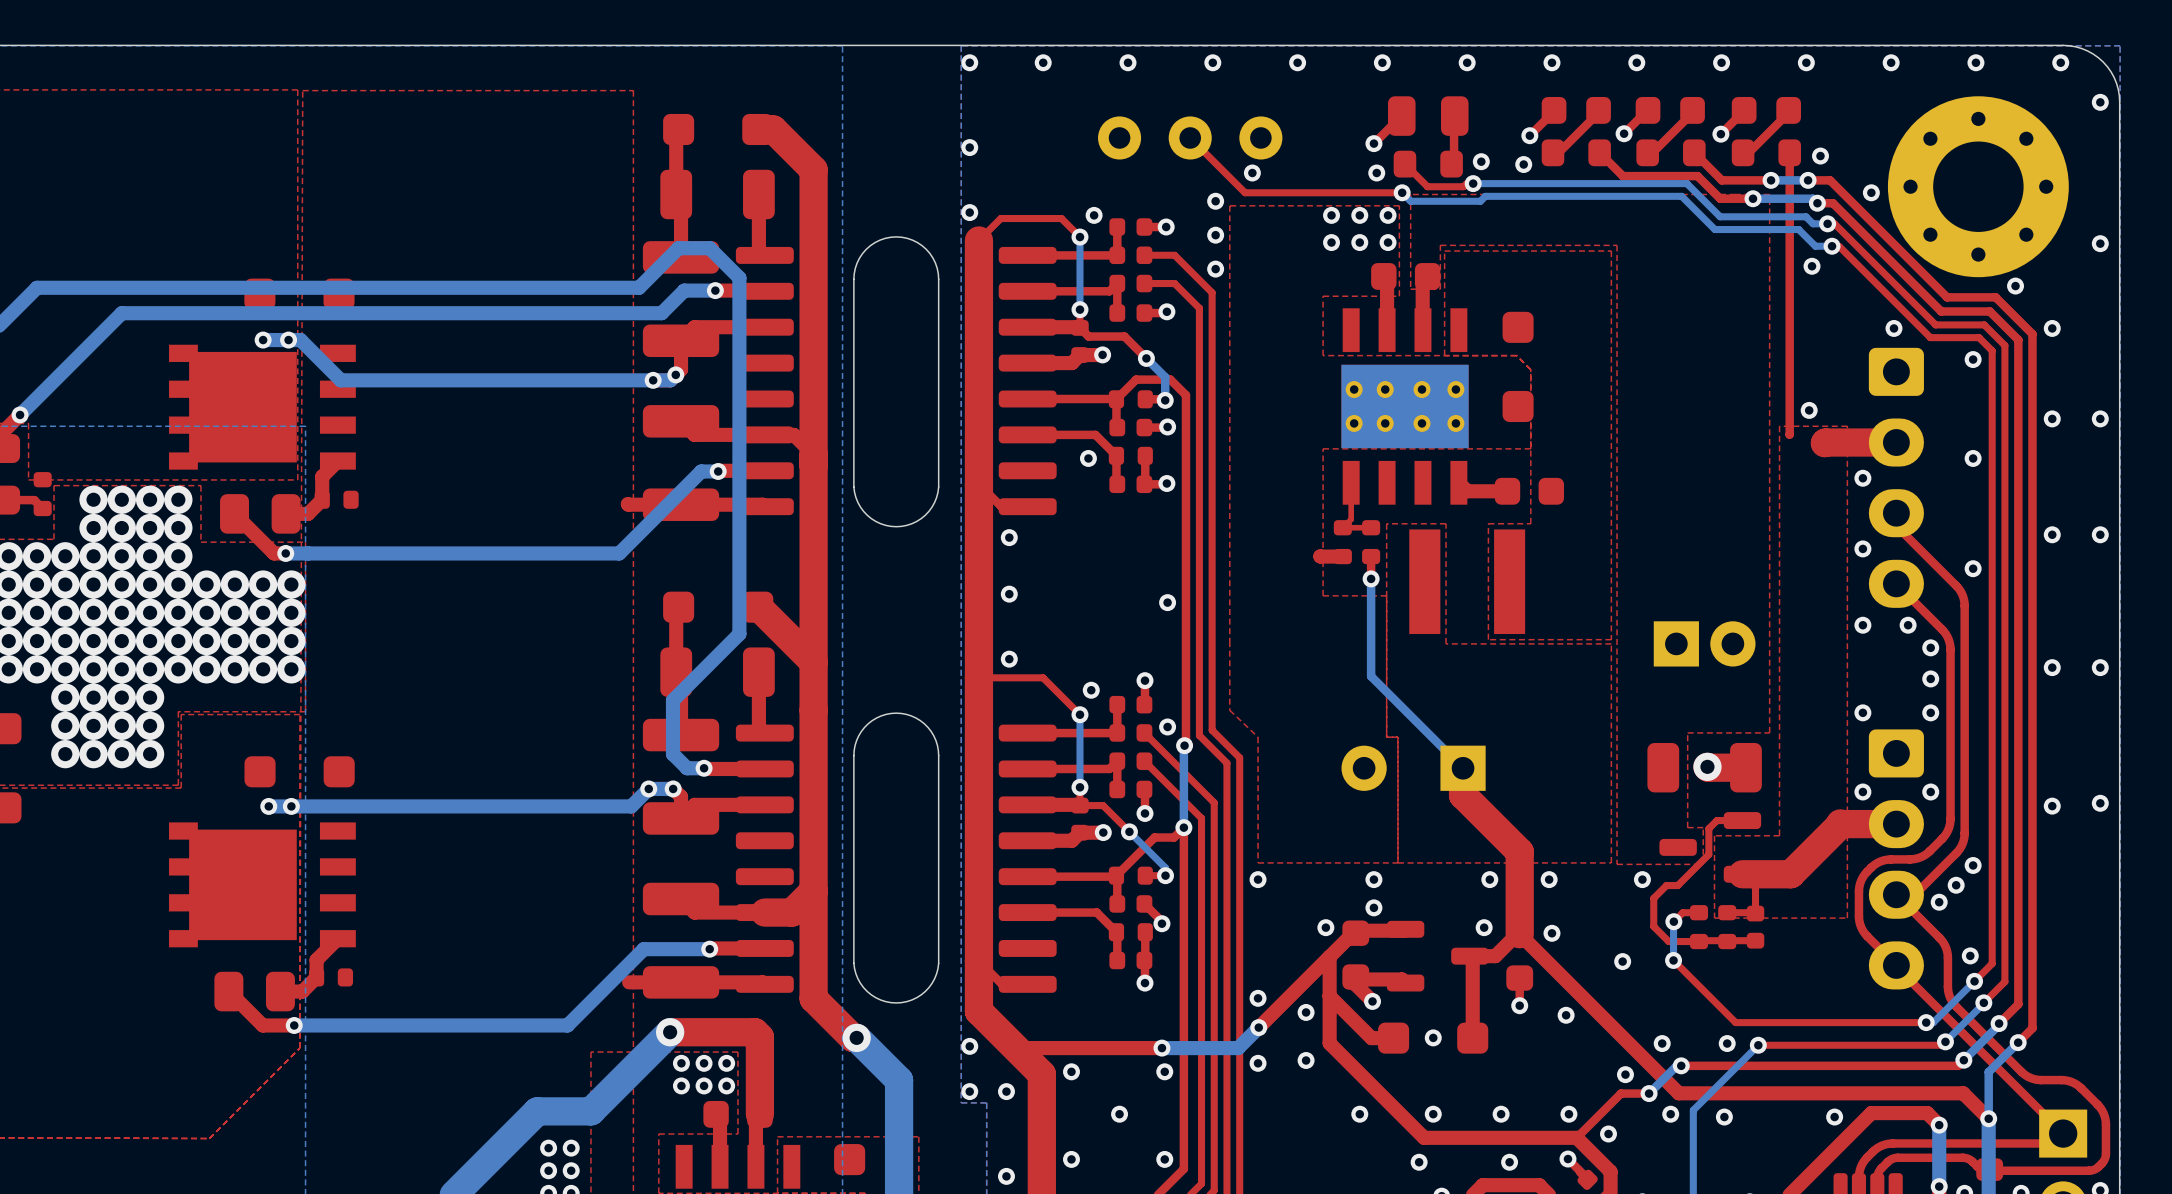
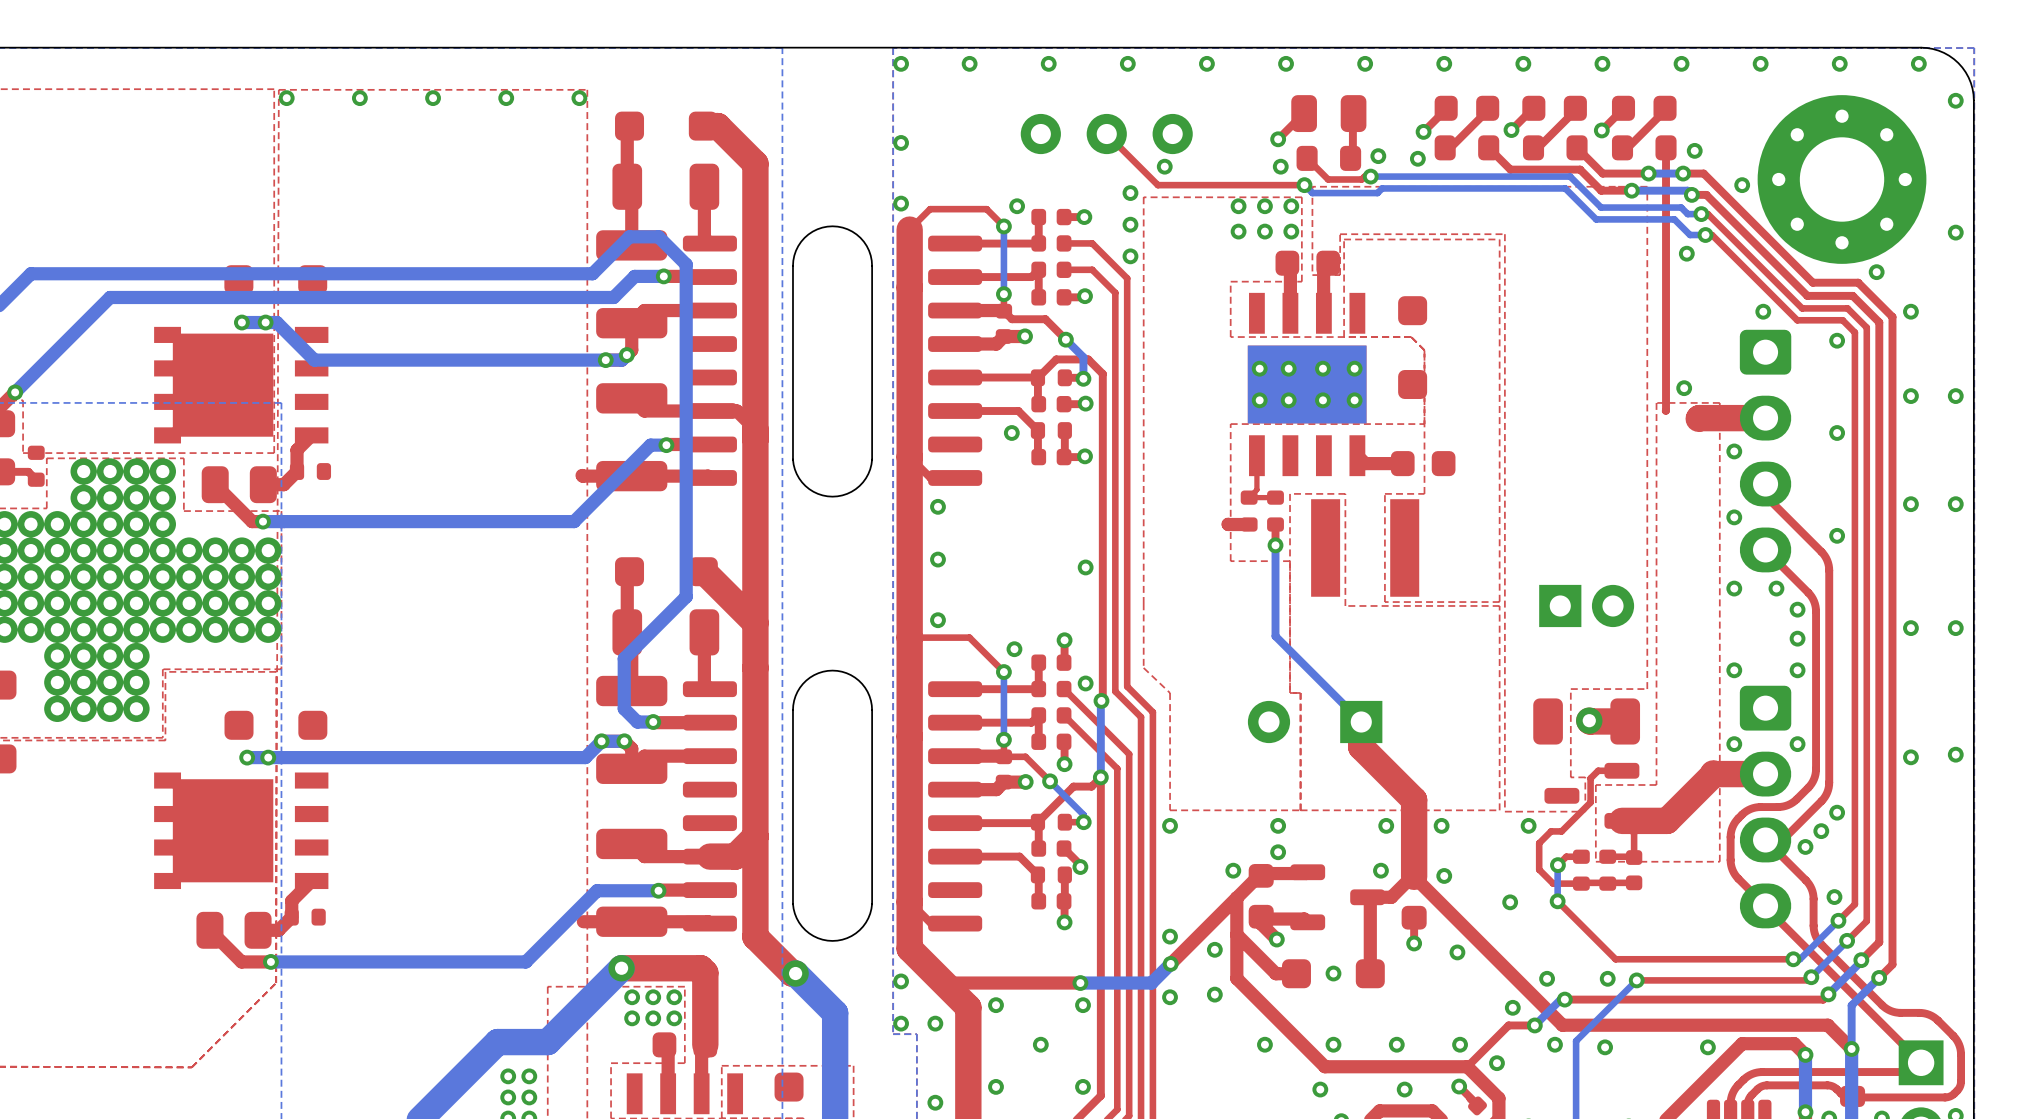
via: none -> (286, 98)
via: none -> (359, 98)
via: none -> (433, 98)
via: none -> (506, 98)
via: none -> (579, 98)

